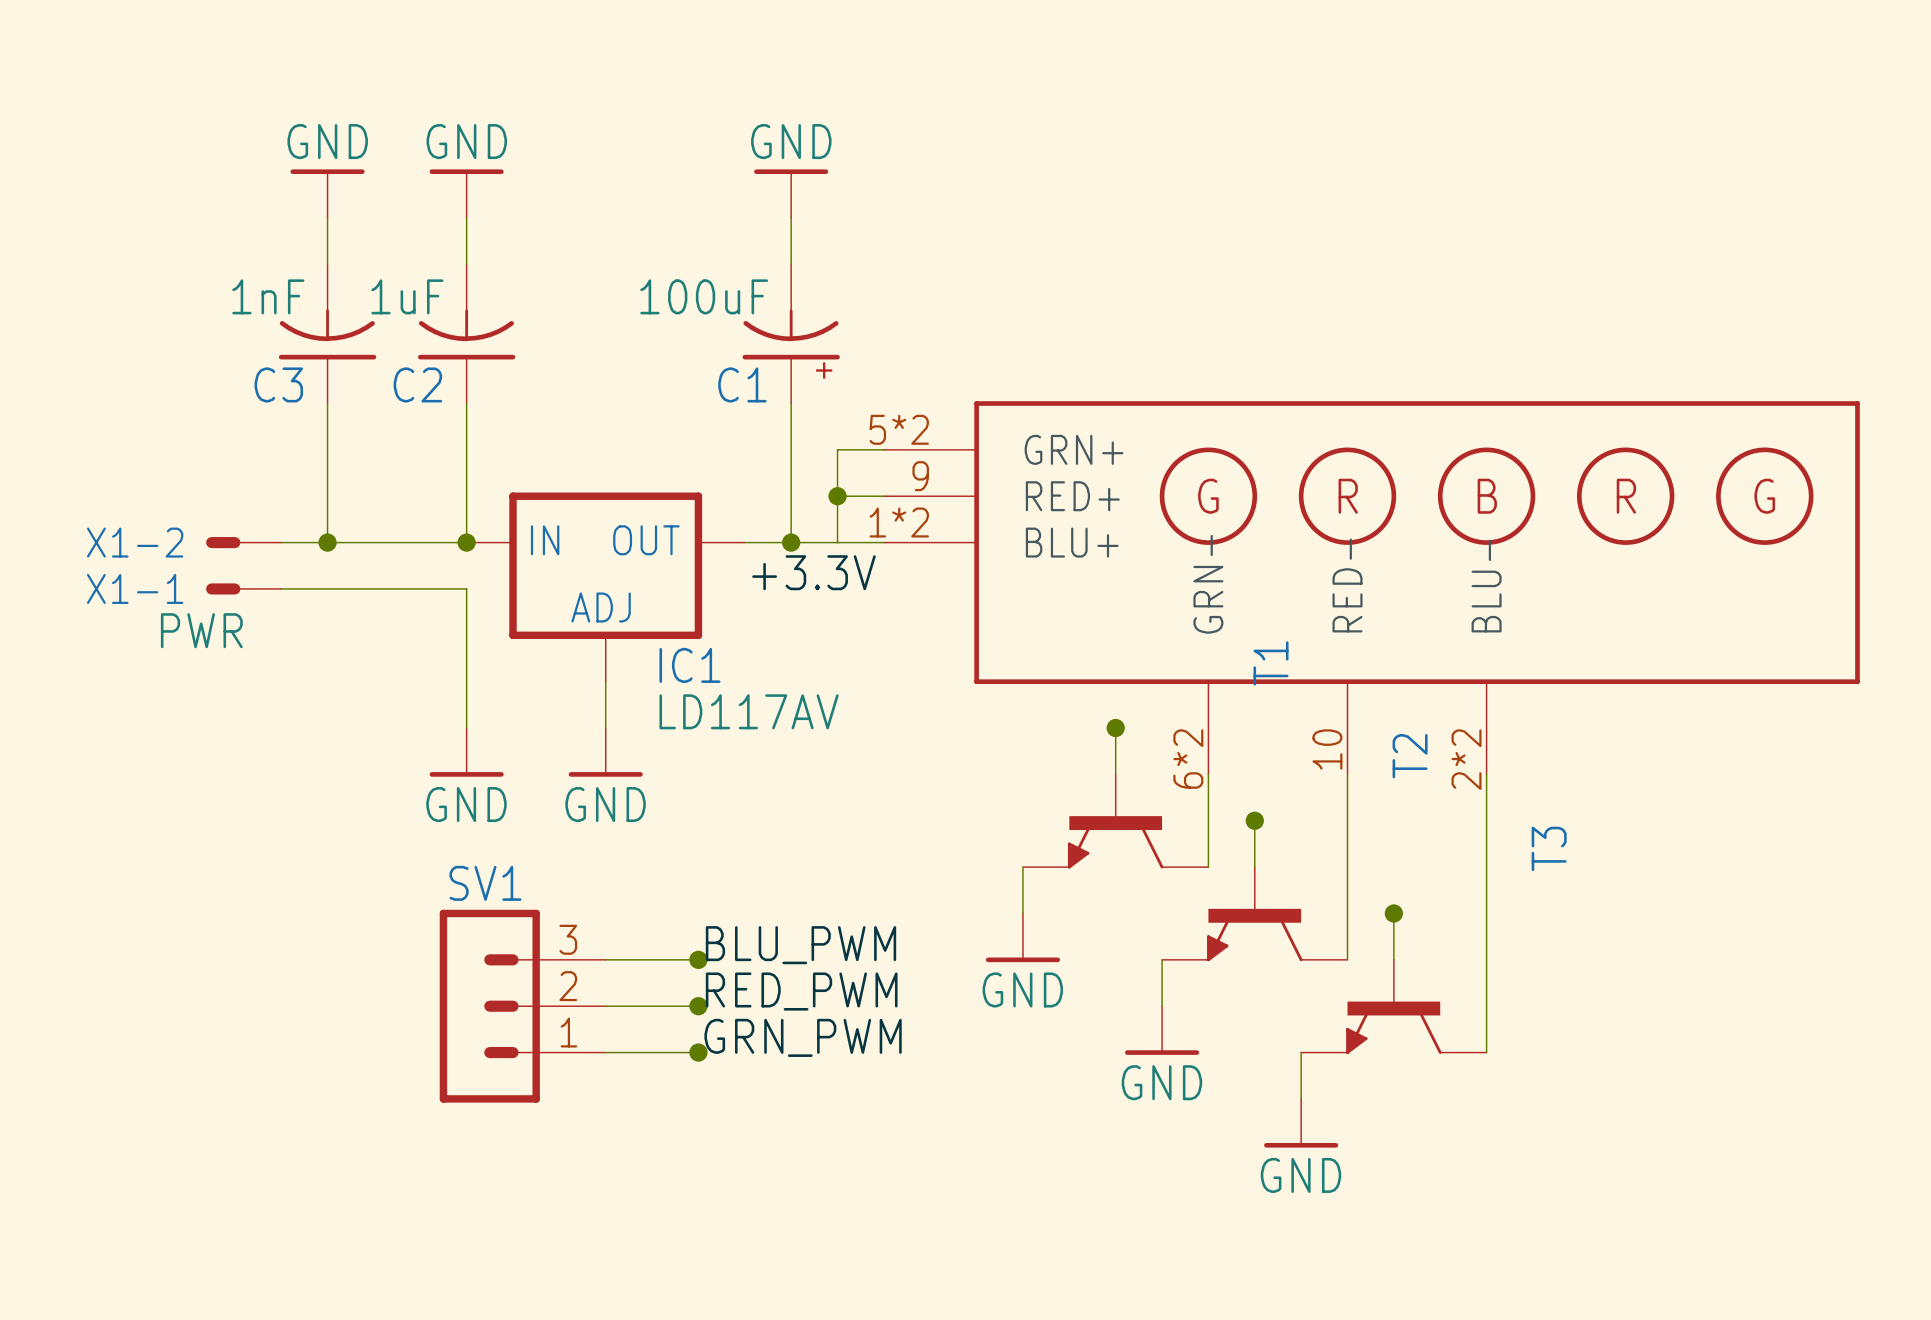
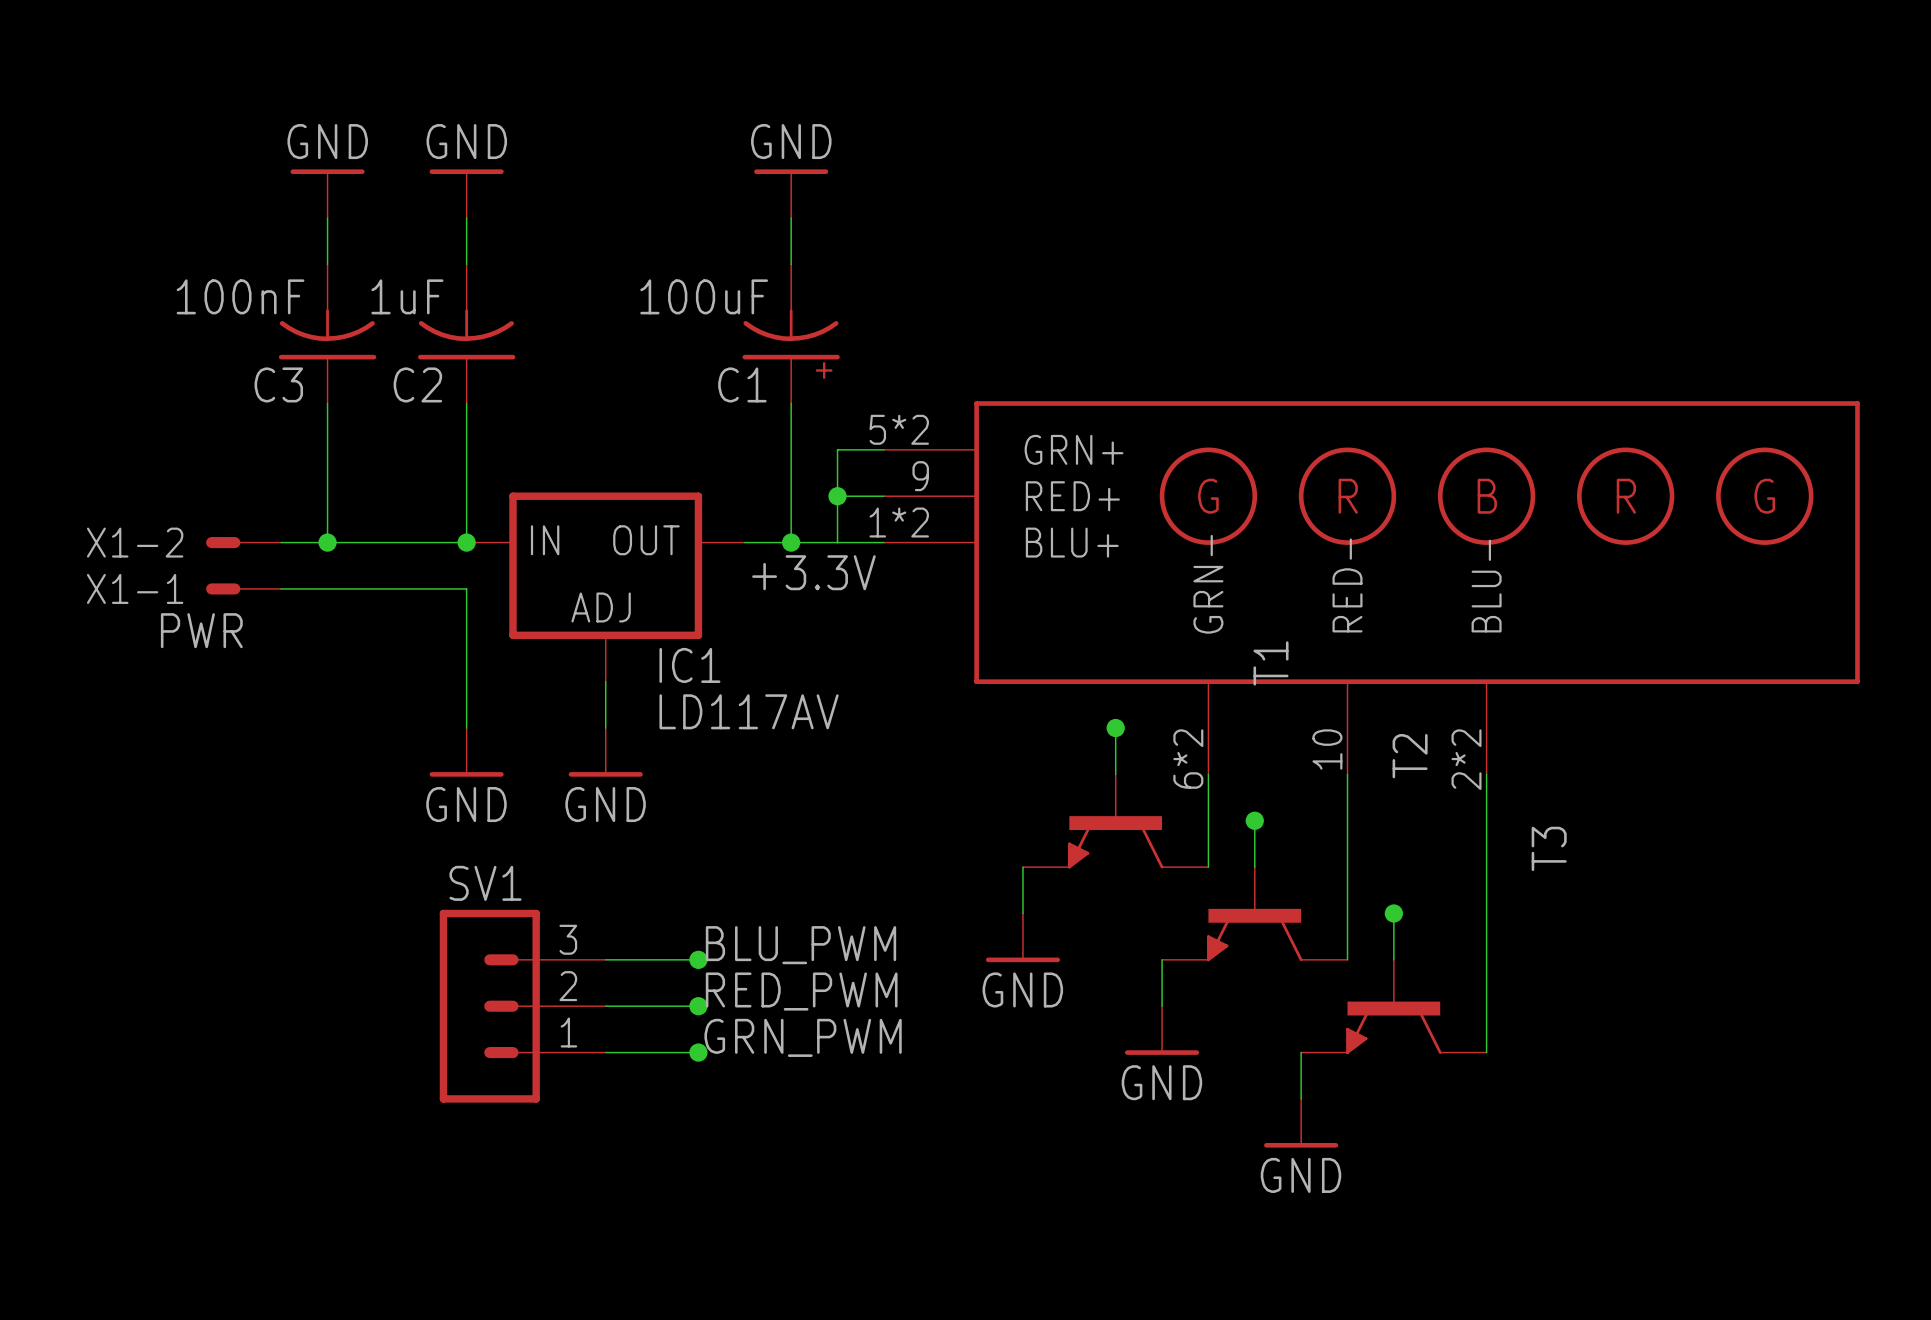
C3 value: 1nF (268, 296) -> 100nF (240, 296)

